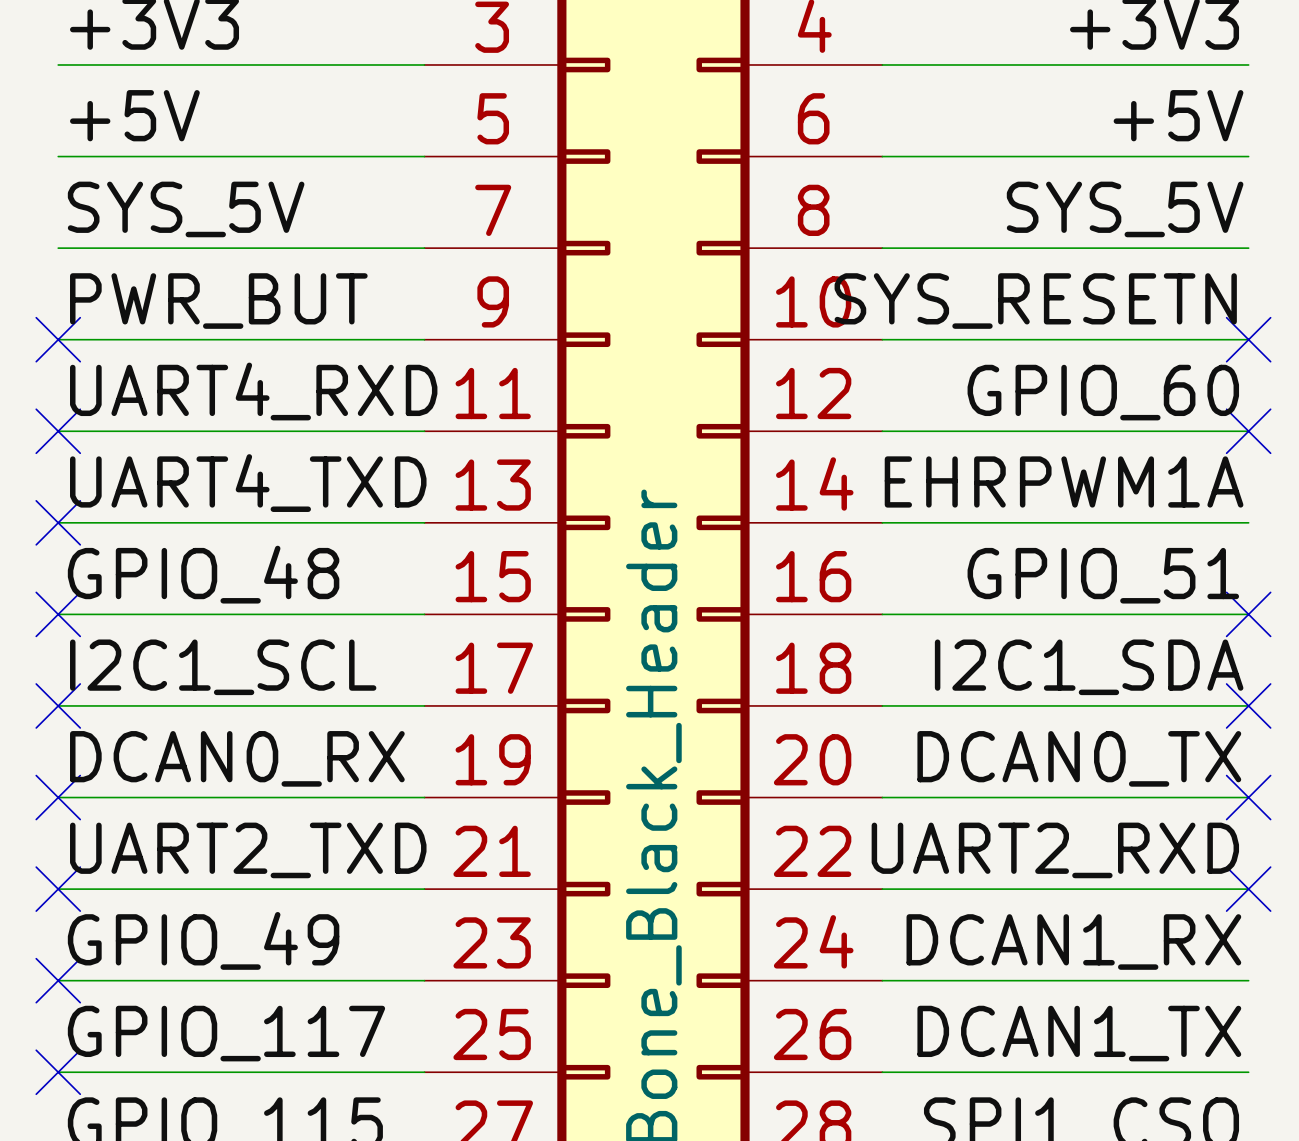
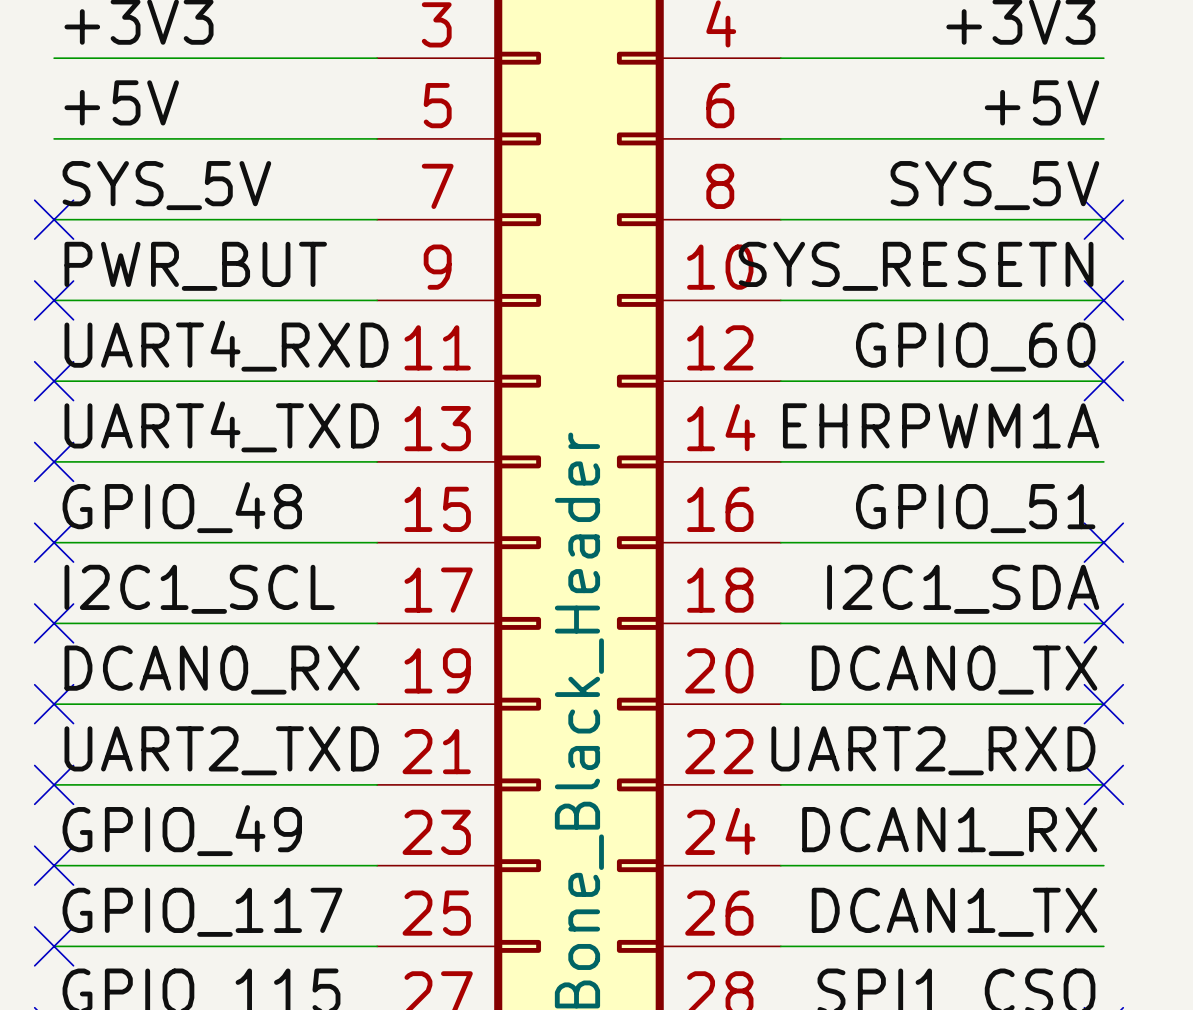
no-connect mark: none -> (54, 219)
no-connect mark: none -> (1103, 219)

